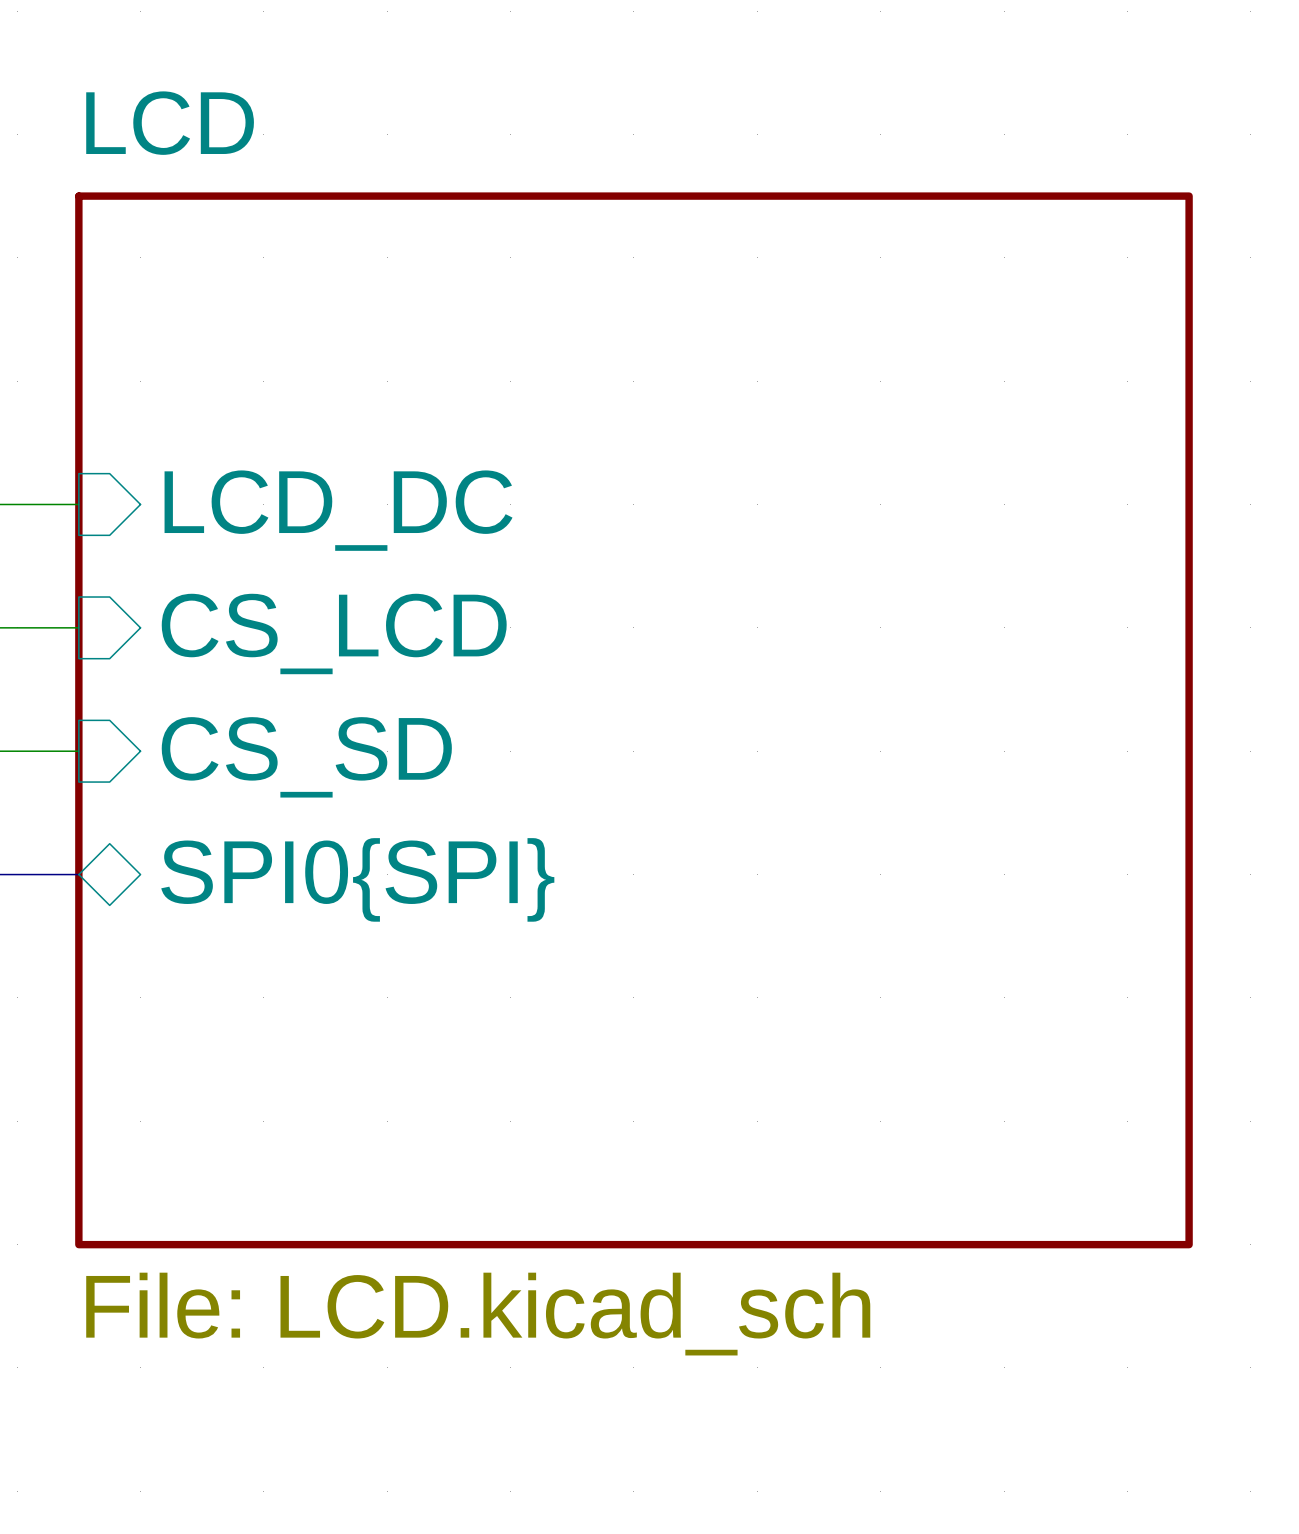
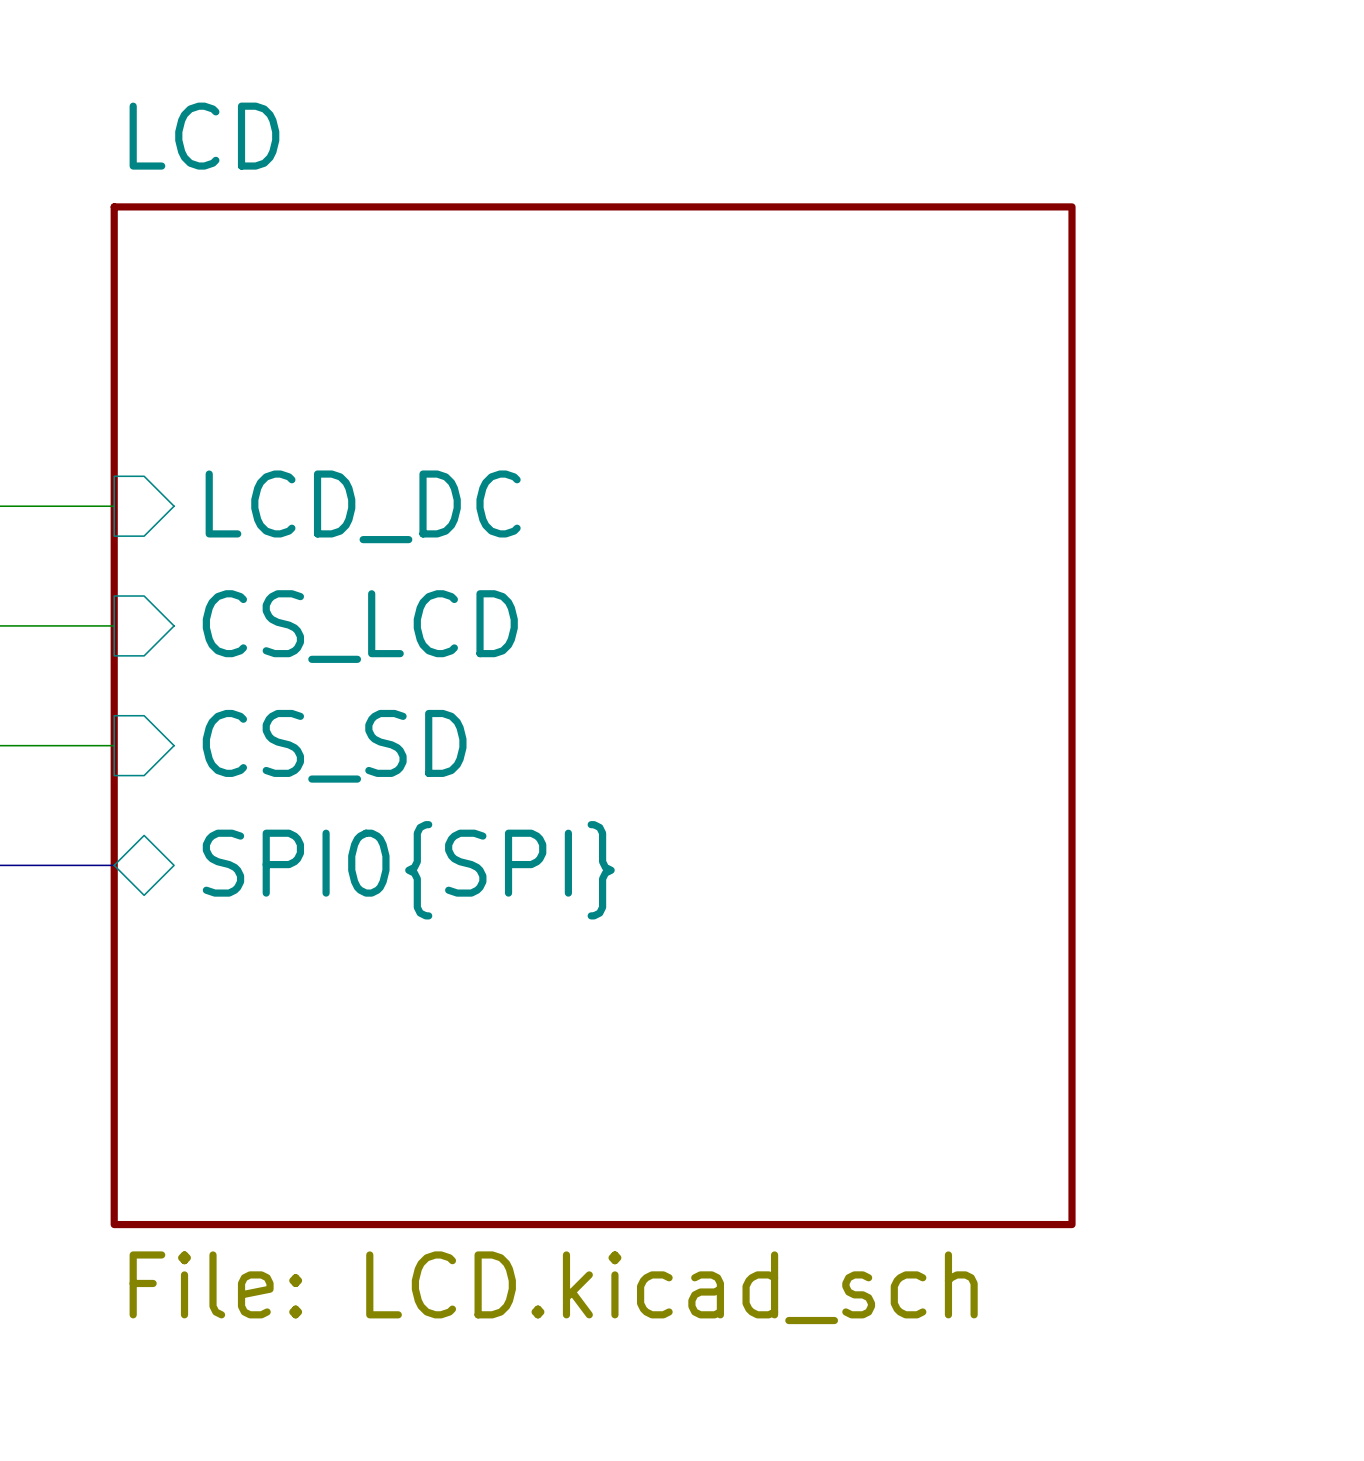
sheet LCD: none -> File: LCD.kicad_sch (593, 715)
sheet LCD: File: LCD.kicad_sch (633, 720) -> none

